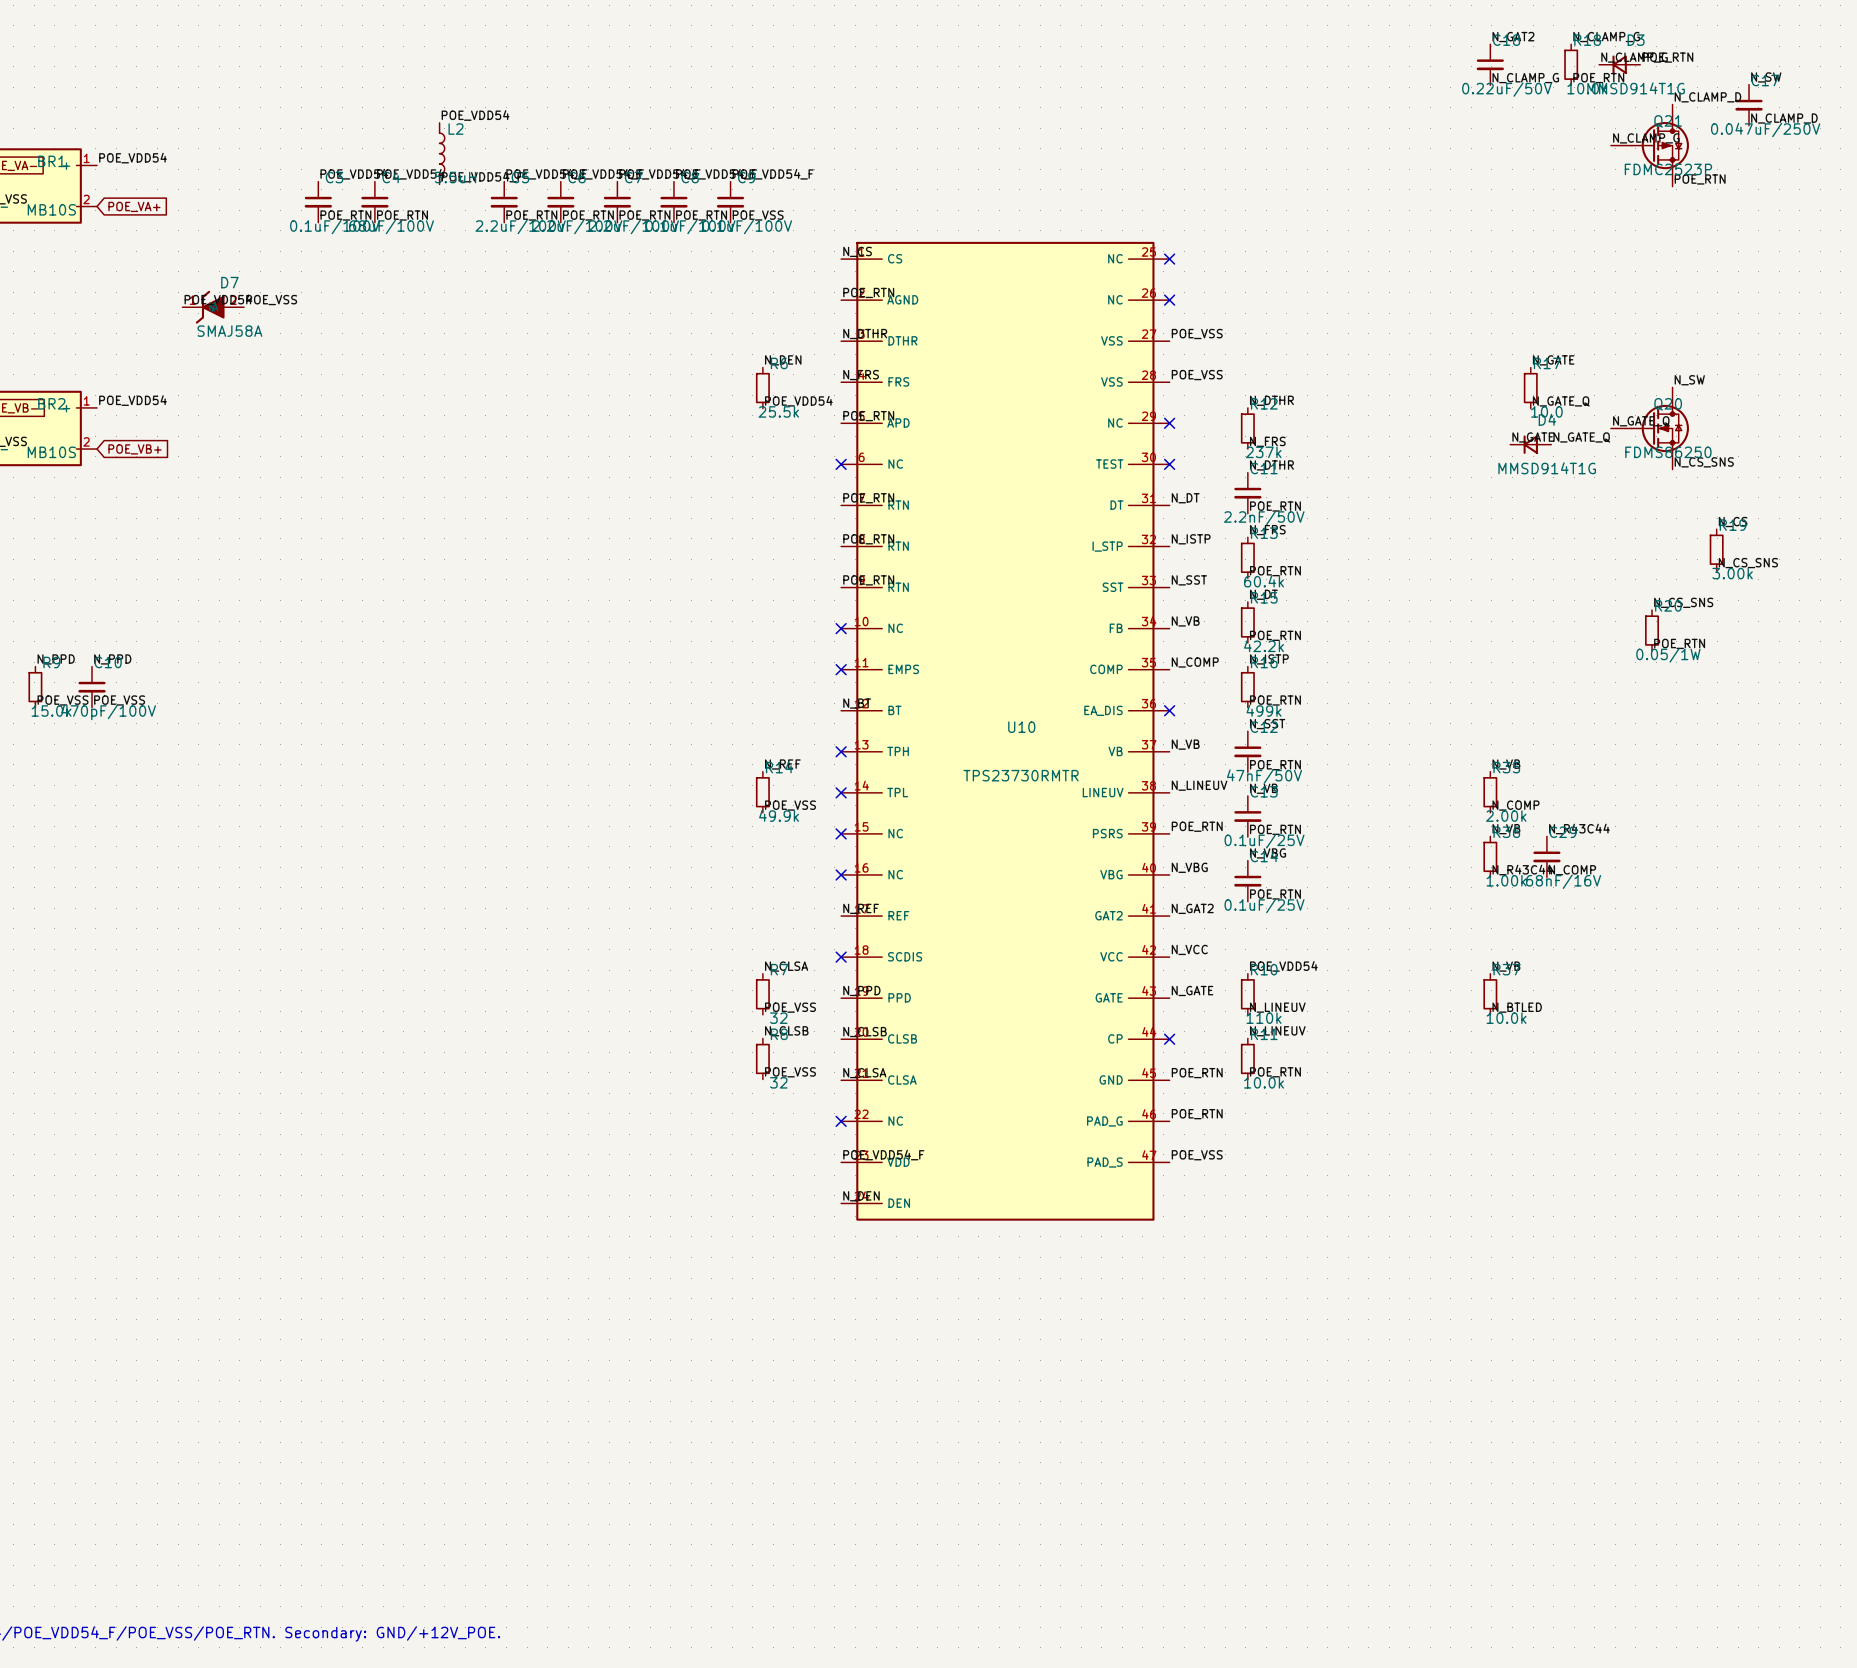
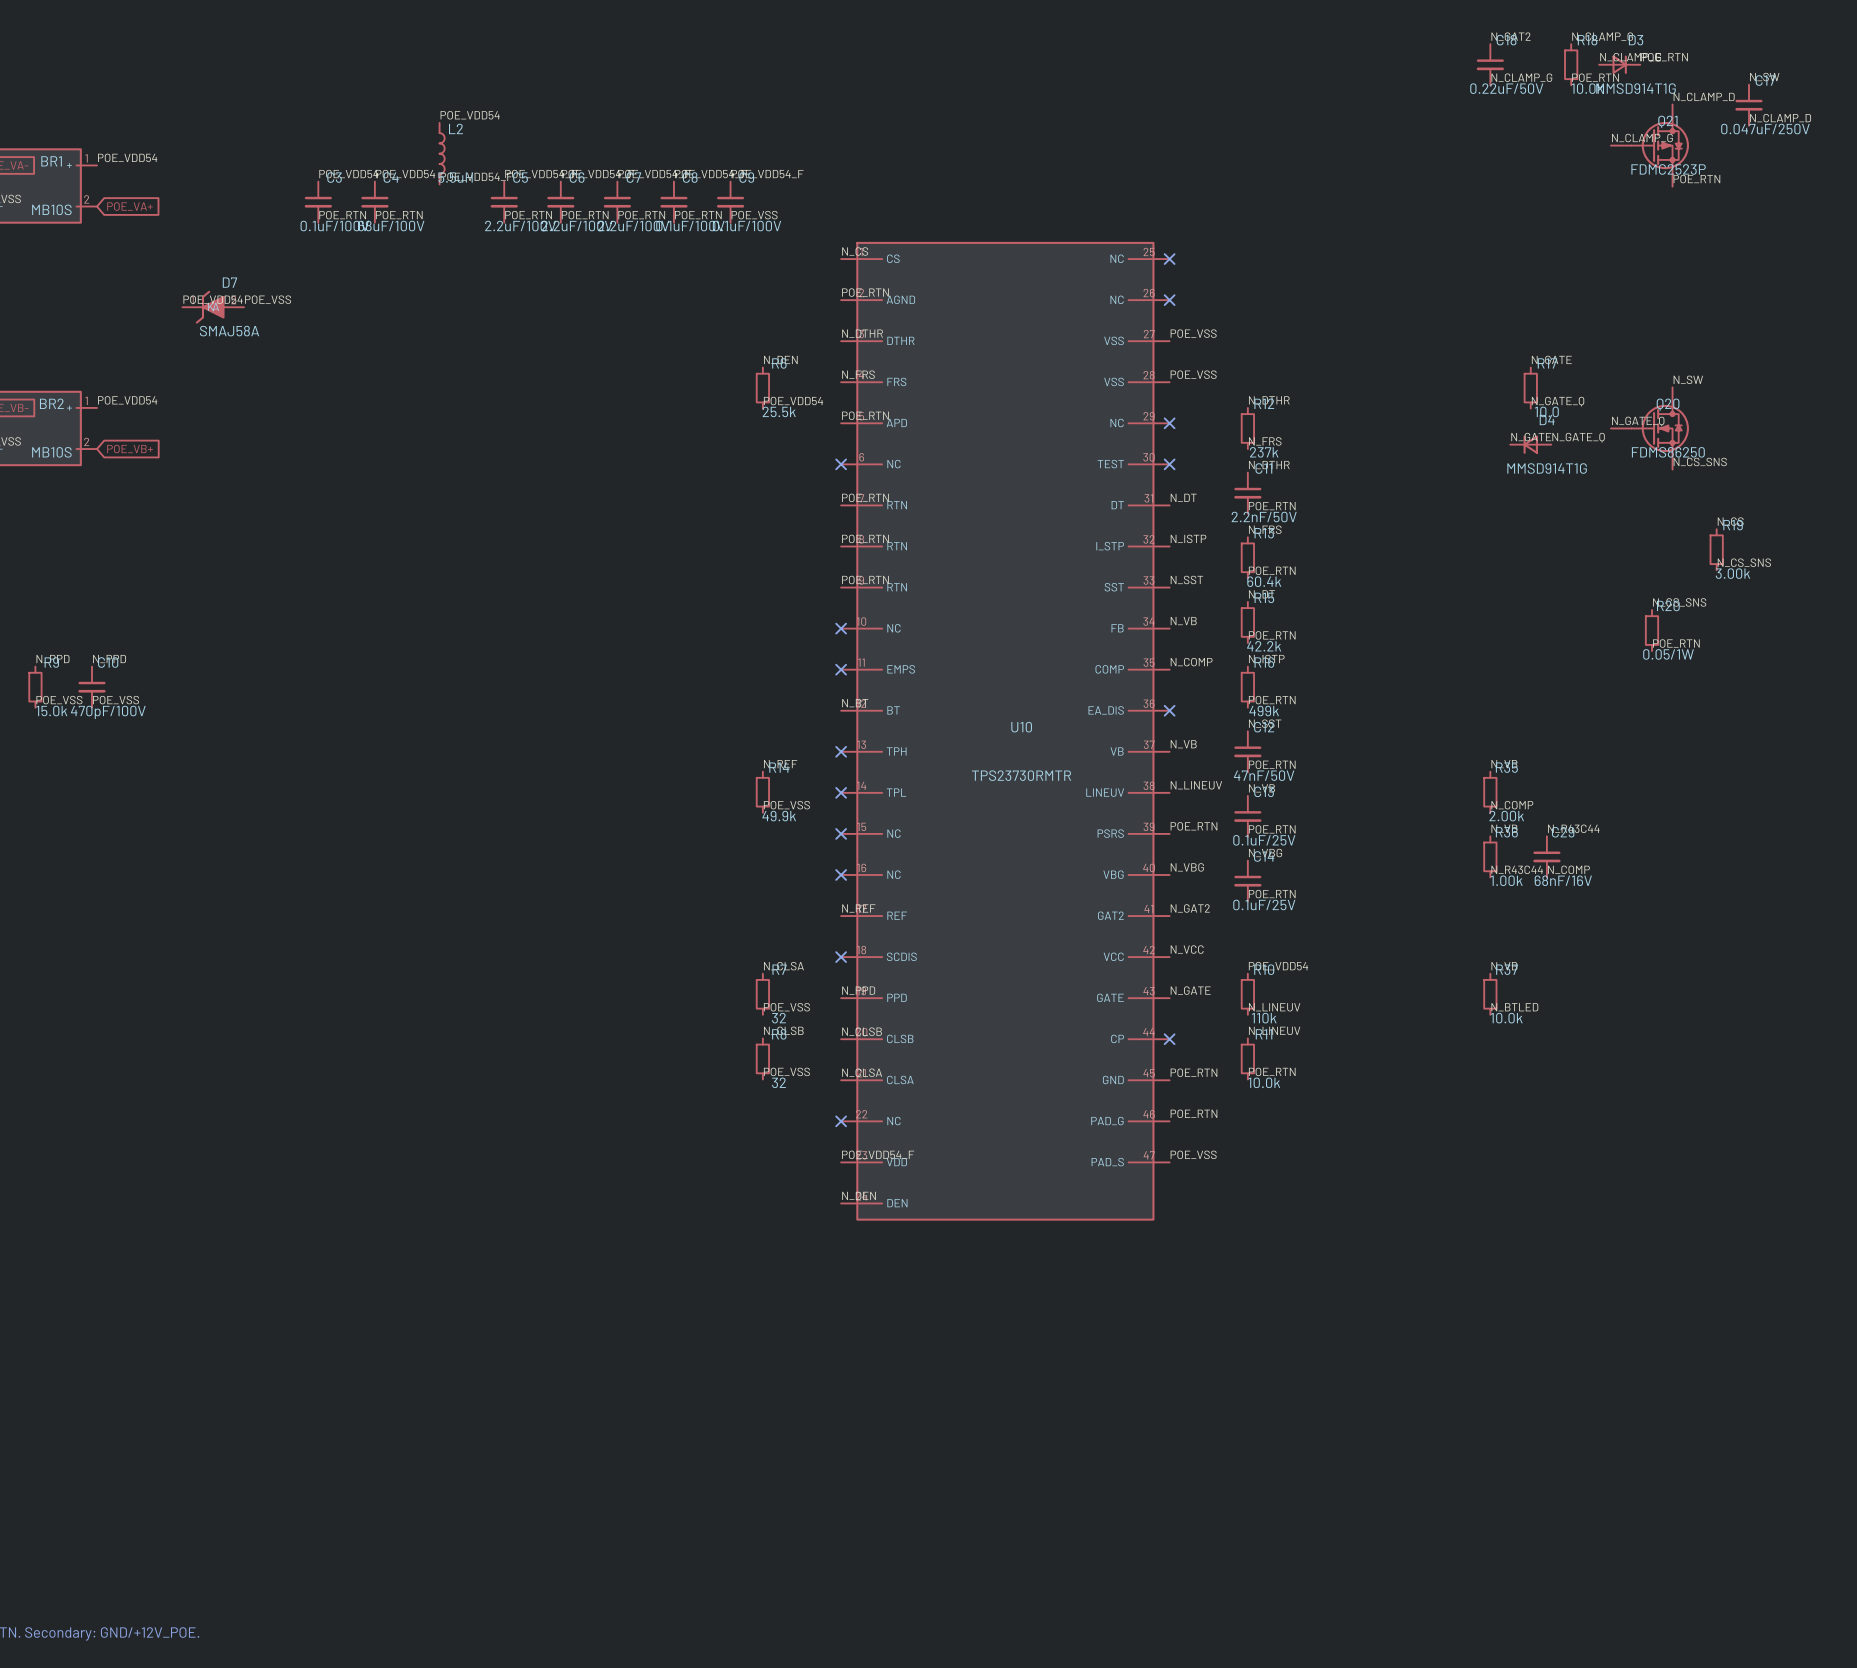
D3 rotation: 0° (1619, 64) -> 180° (1619, 64)

